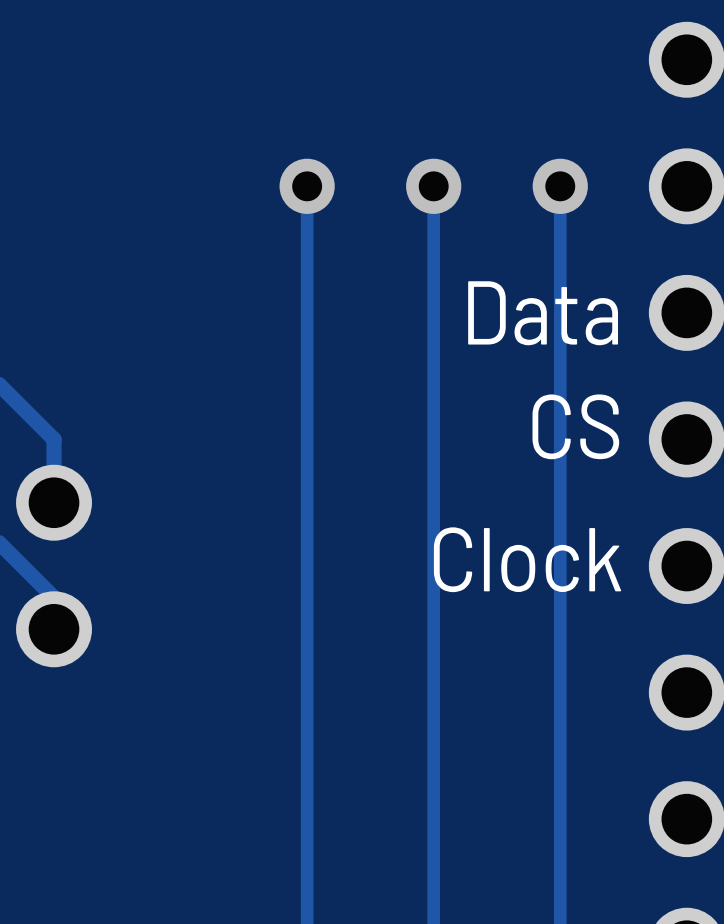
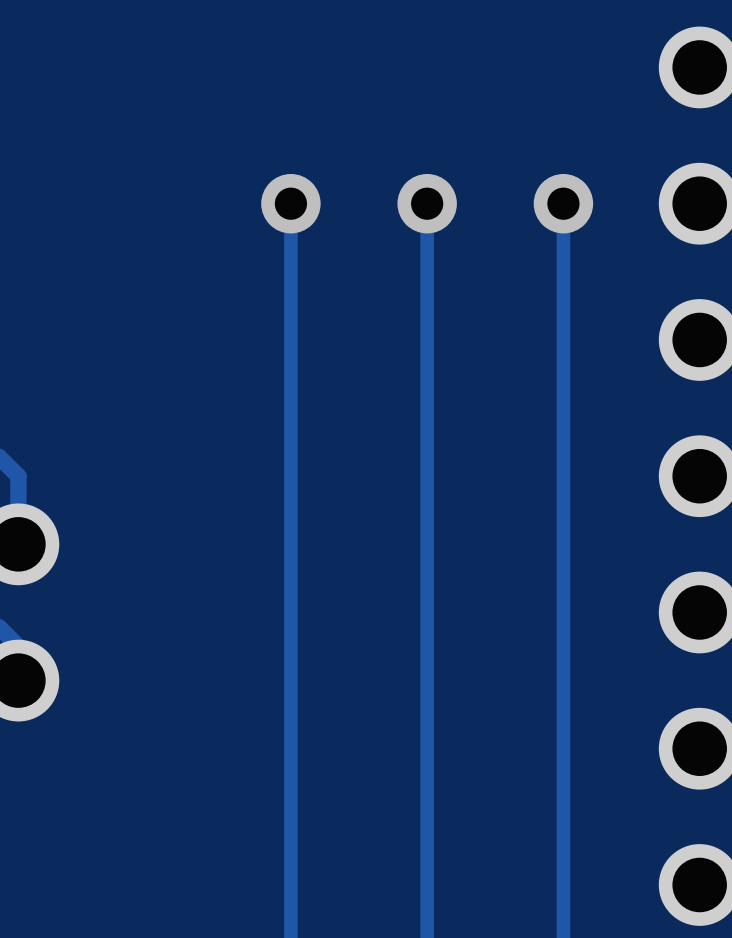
text: Data (543, 313) -> none
text: CS (575, 426) -> none
text: Clock (527, 559) -> none

